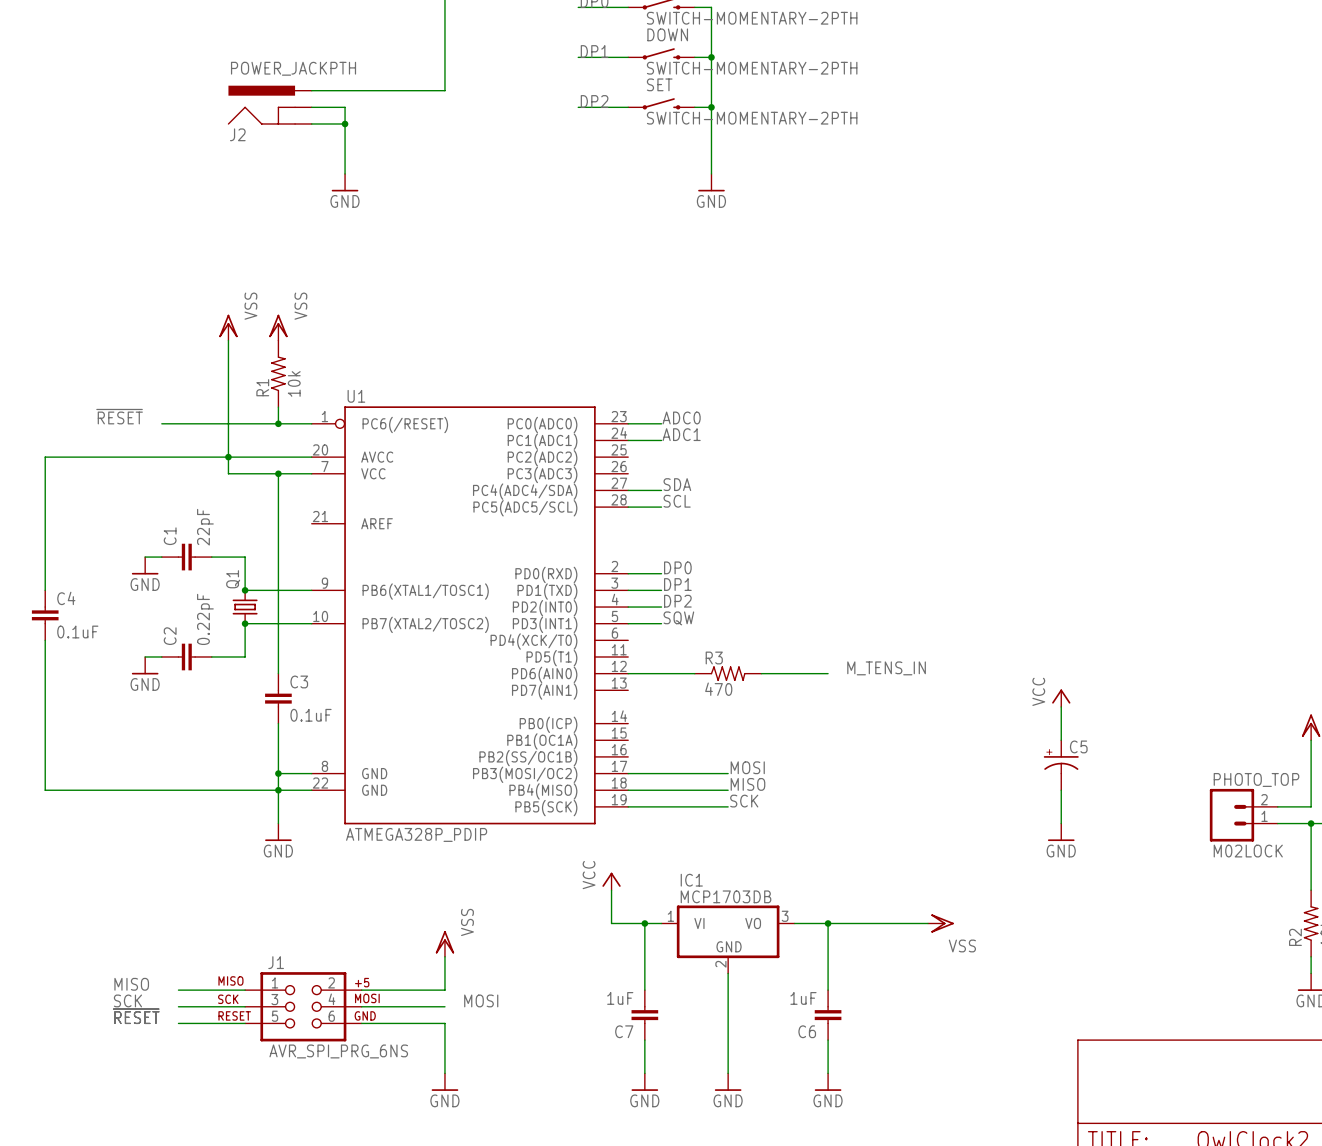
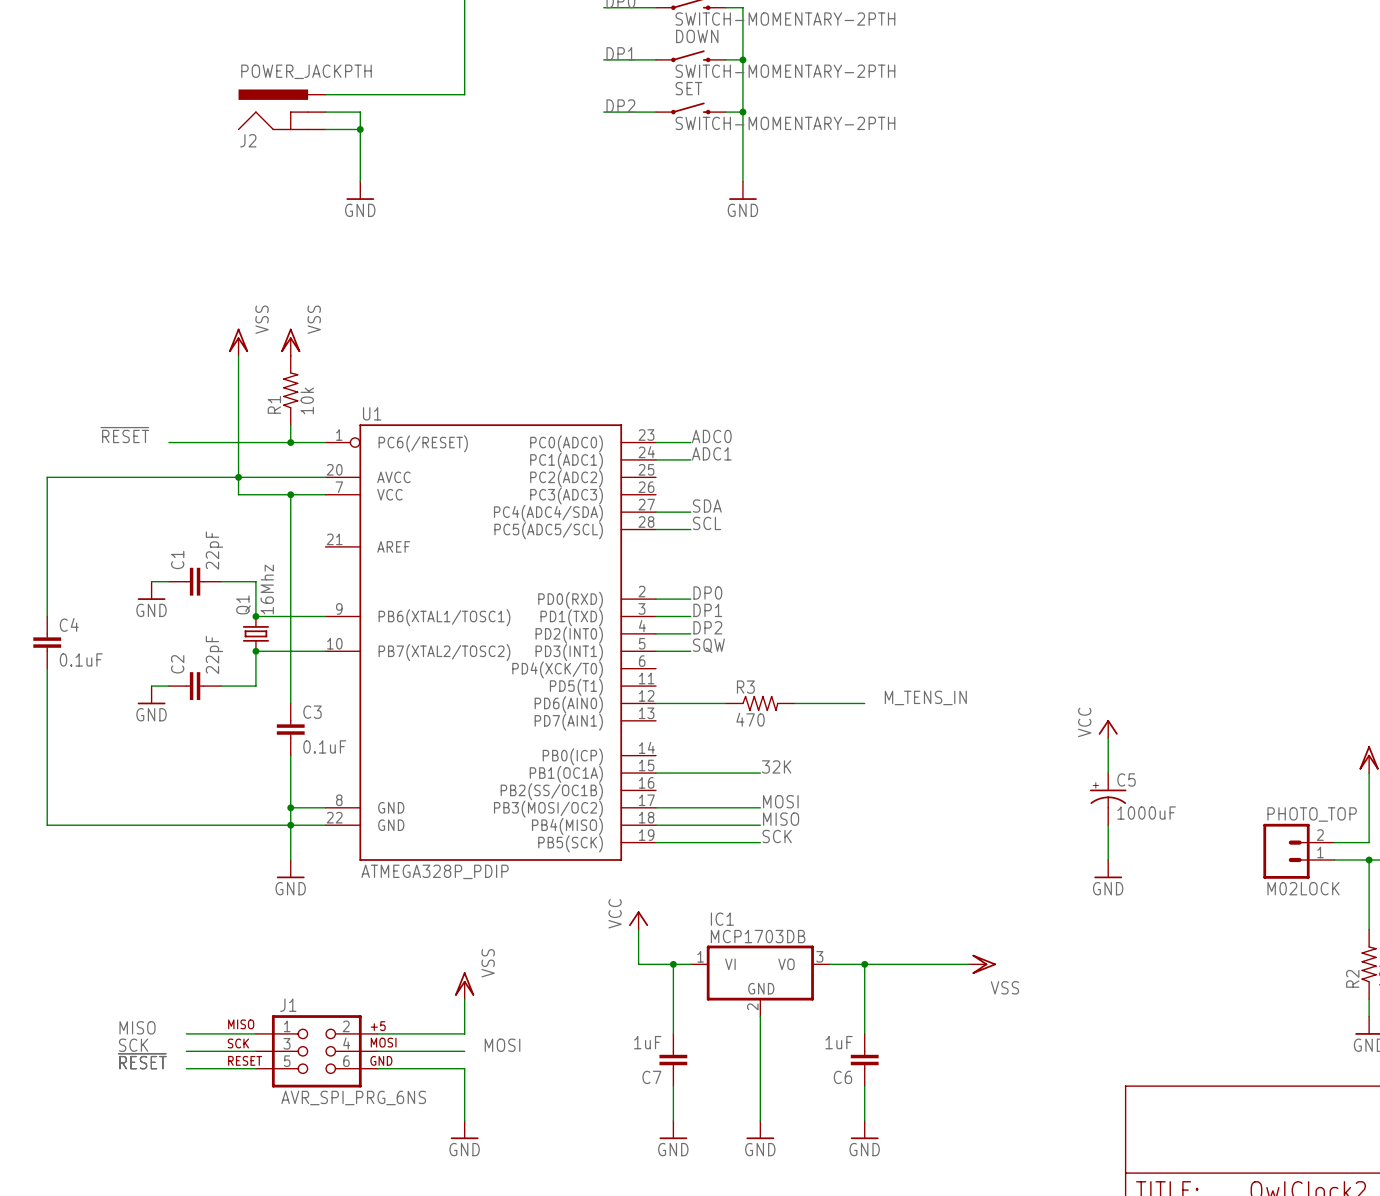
Q1 value: none -> 16Mhz (267, 589)
C2 value: 0.22pF (205, 619) -> 22pF (214, 654)
label: none -> 32K (776, 766)
wire: none -> (655, 773) (760, 773)
C5 value: none -> 1000uF (1146, 813)

